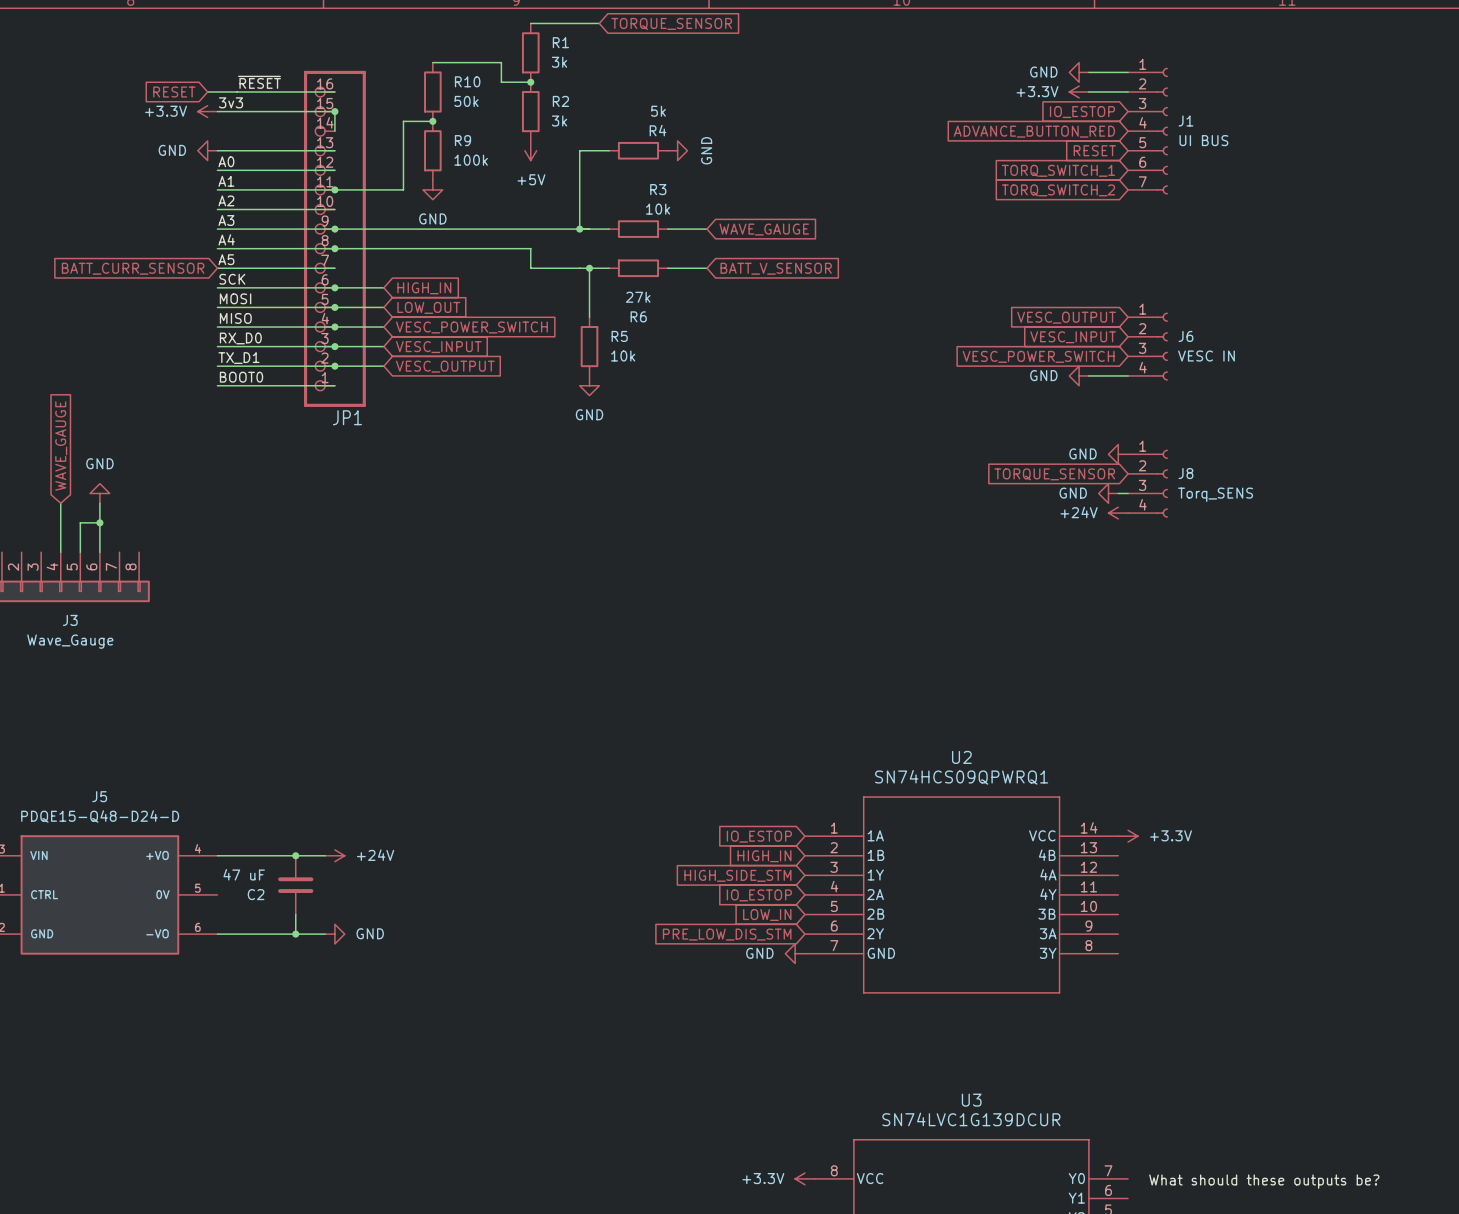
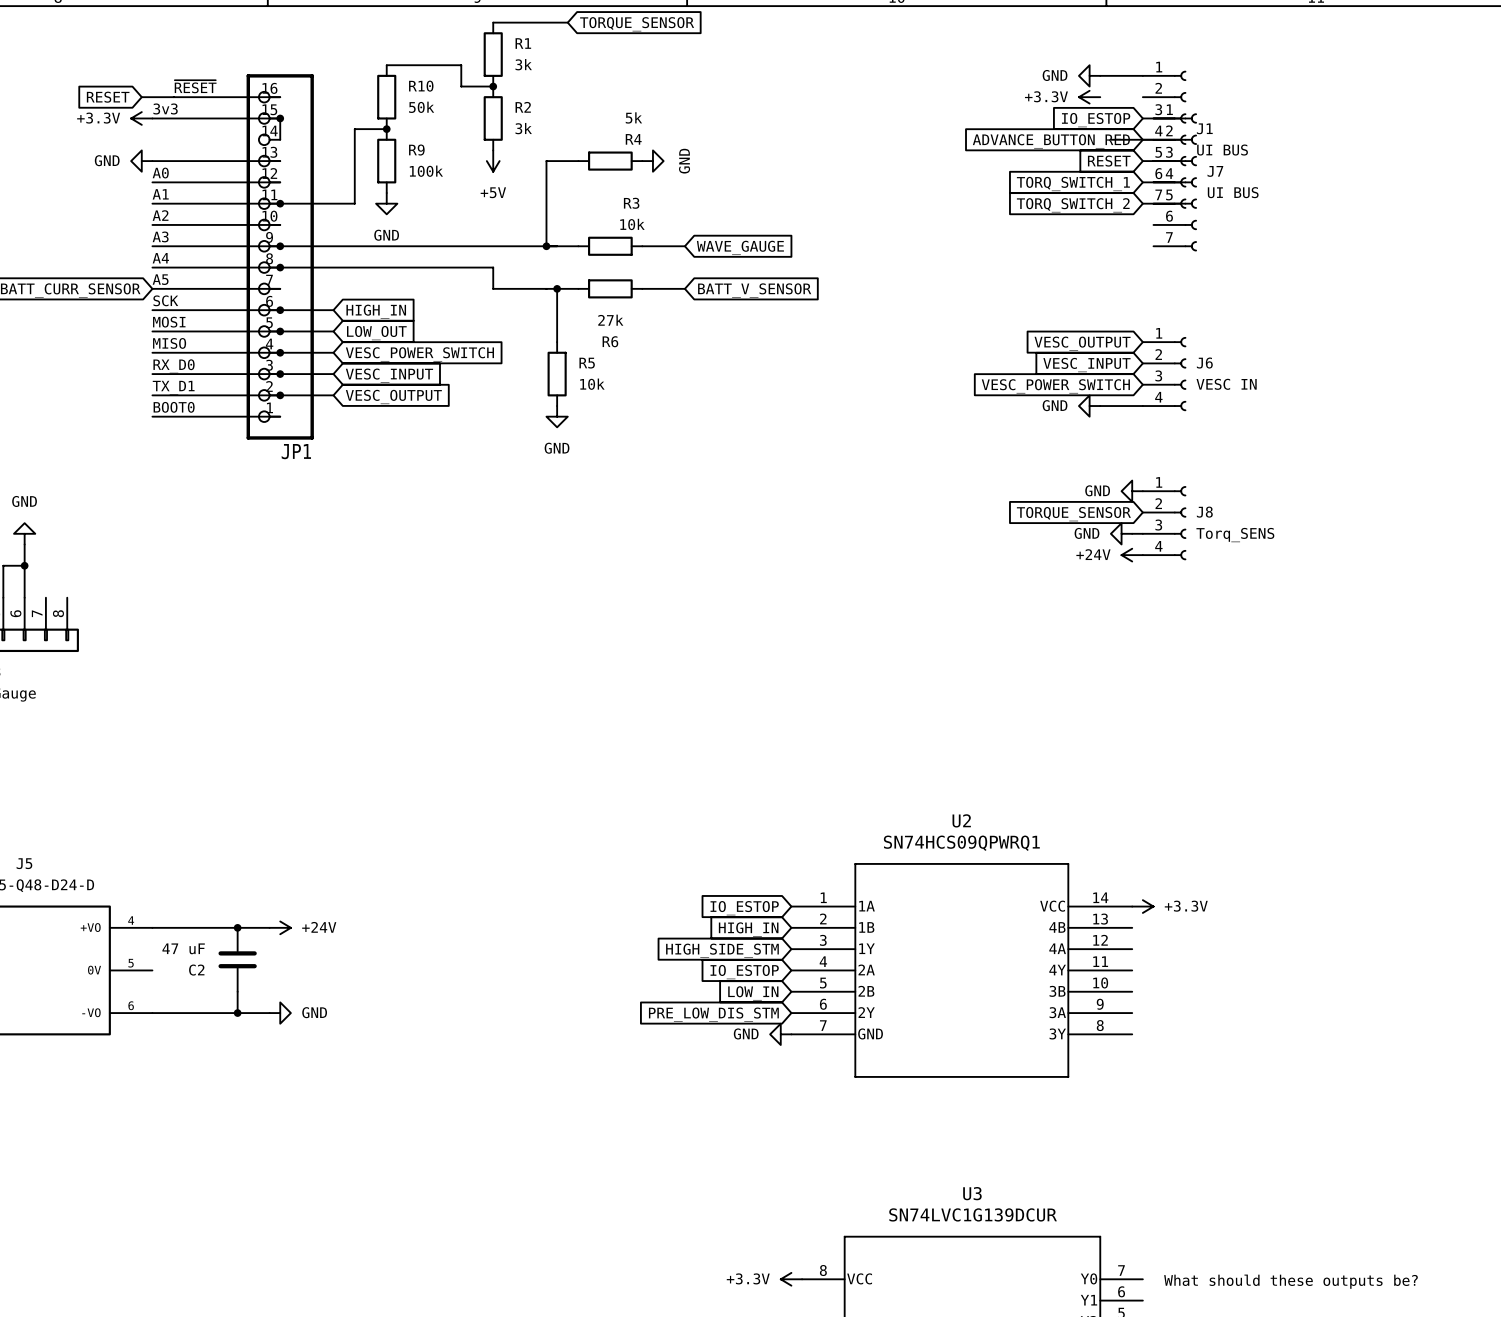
wire: (1088, 92) (1128, 92) -> (1110, 139) (1153, 139)
J7: none -> UI BUS (1175, 182)

